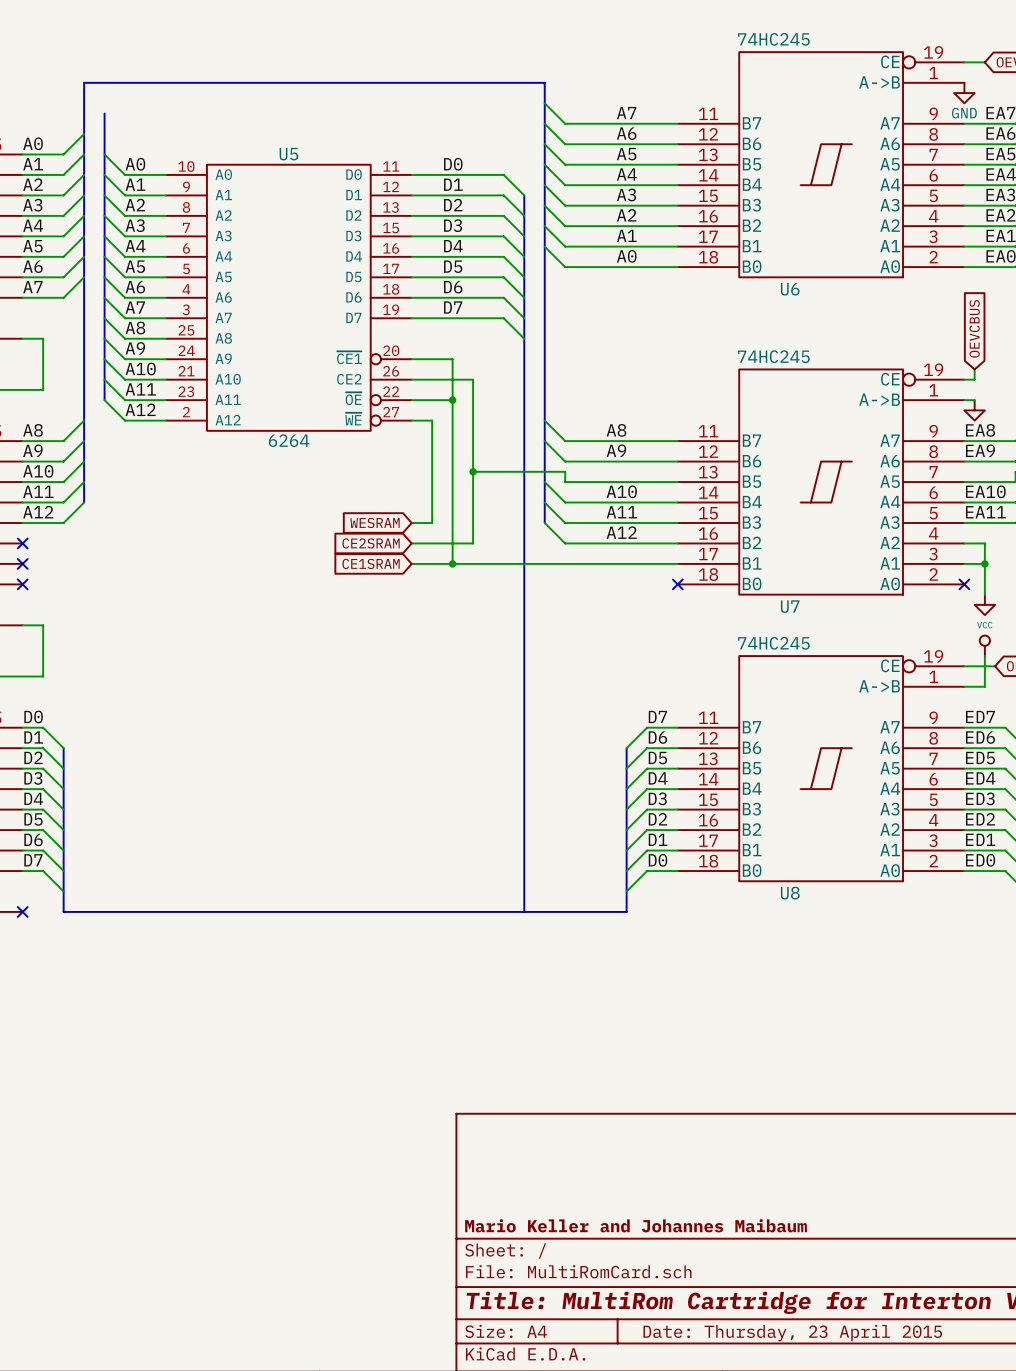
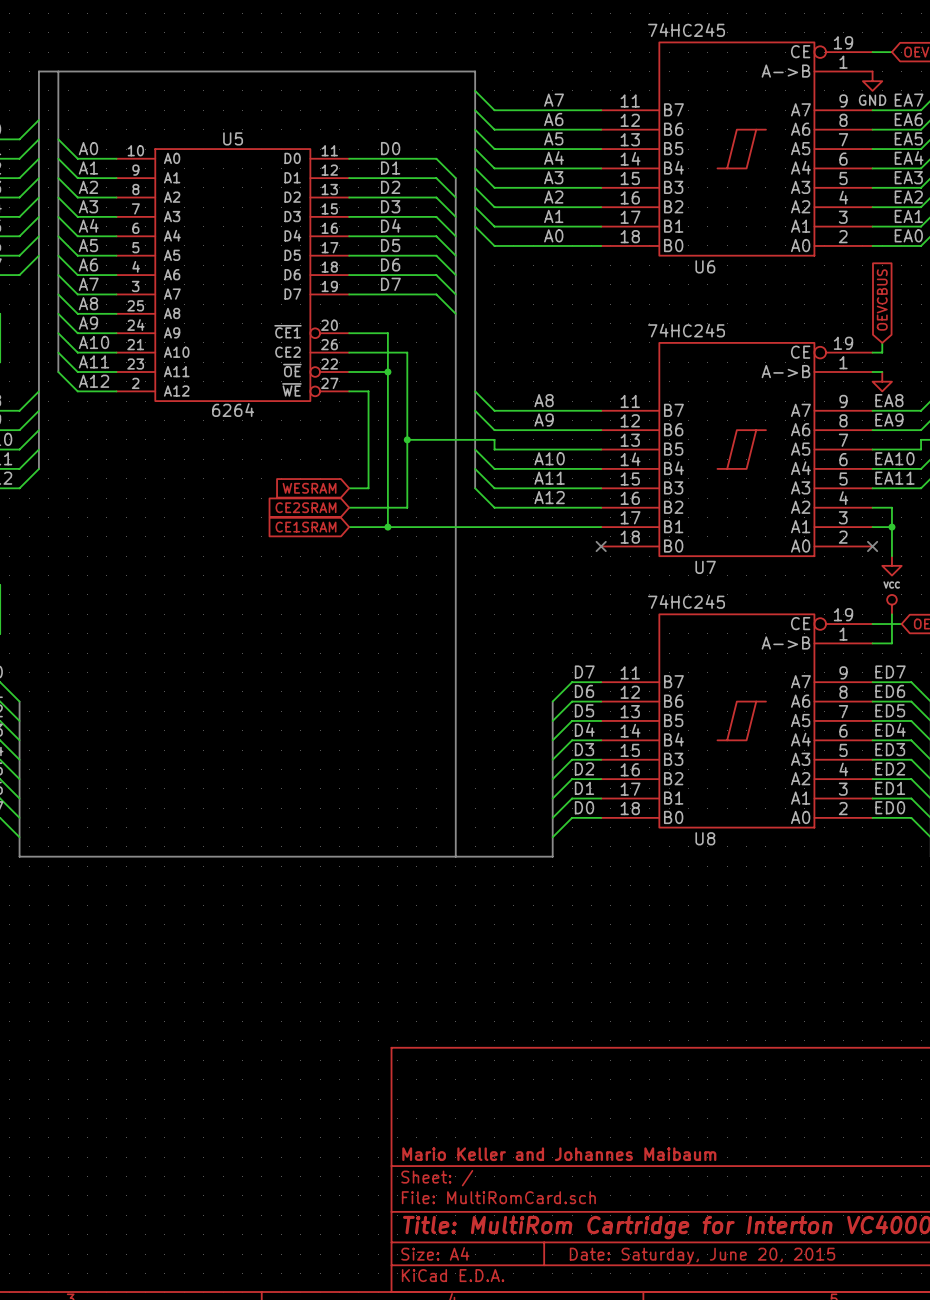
bus: none -> (58, 71) (58, 100)
title block: Date: Thursday, 23 April 2015 (792, 1333) -> Date: Saturday, June 20, 2015 (702, 1256)

